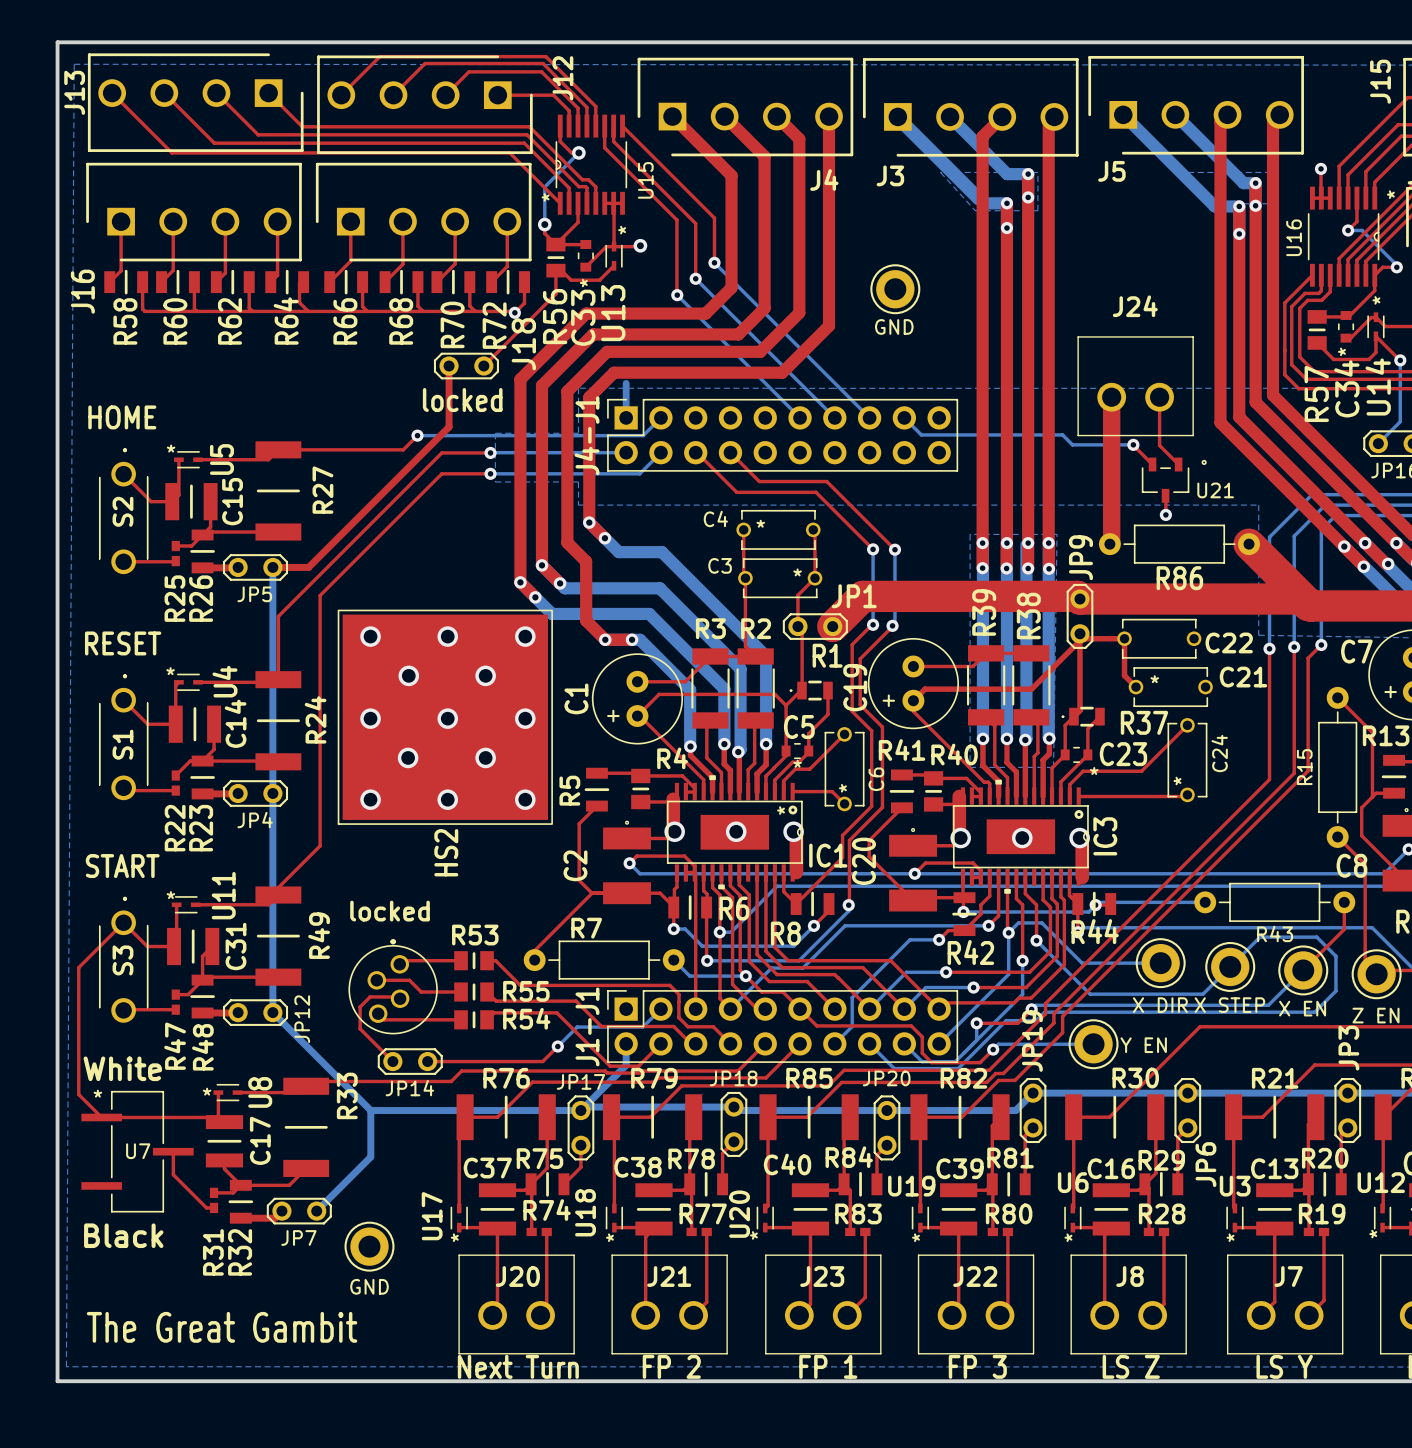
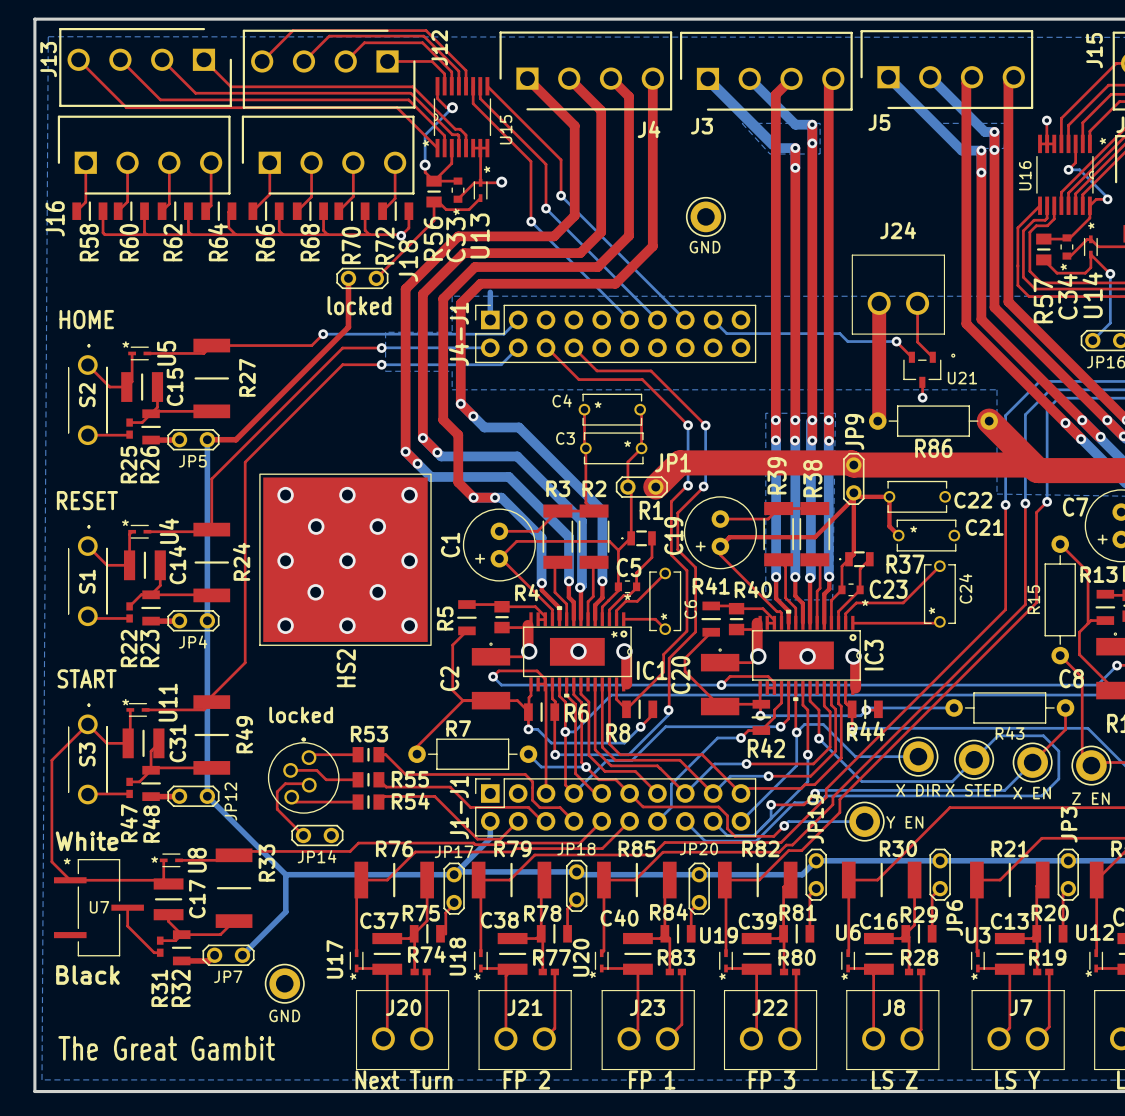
bottom track: (660, 1009) (642, 1027) (577, 1027) (557, 1046) -> none
top track: (557, 1046) (542, 1061) (427, 1061) -> none
via: (557, 1046) -> none
top track: (580, 1145) (580, 1167) (563, 1184) -> none
top track: none -> (456, 902) (445, 912) (445, 934)

